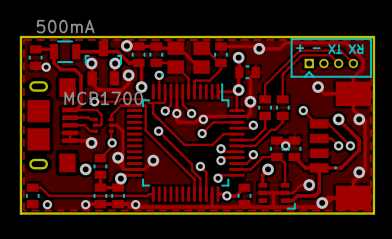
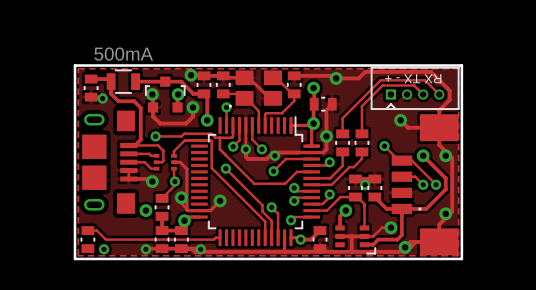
part footprint: [84, 40, 122, 86] -> [144, 76, 186, 113]
part value: MCP1700 (103, 98) -> none

